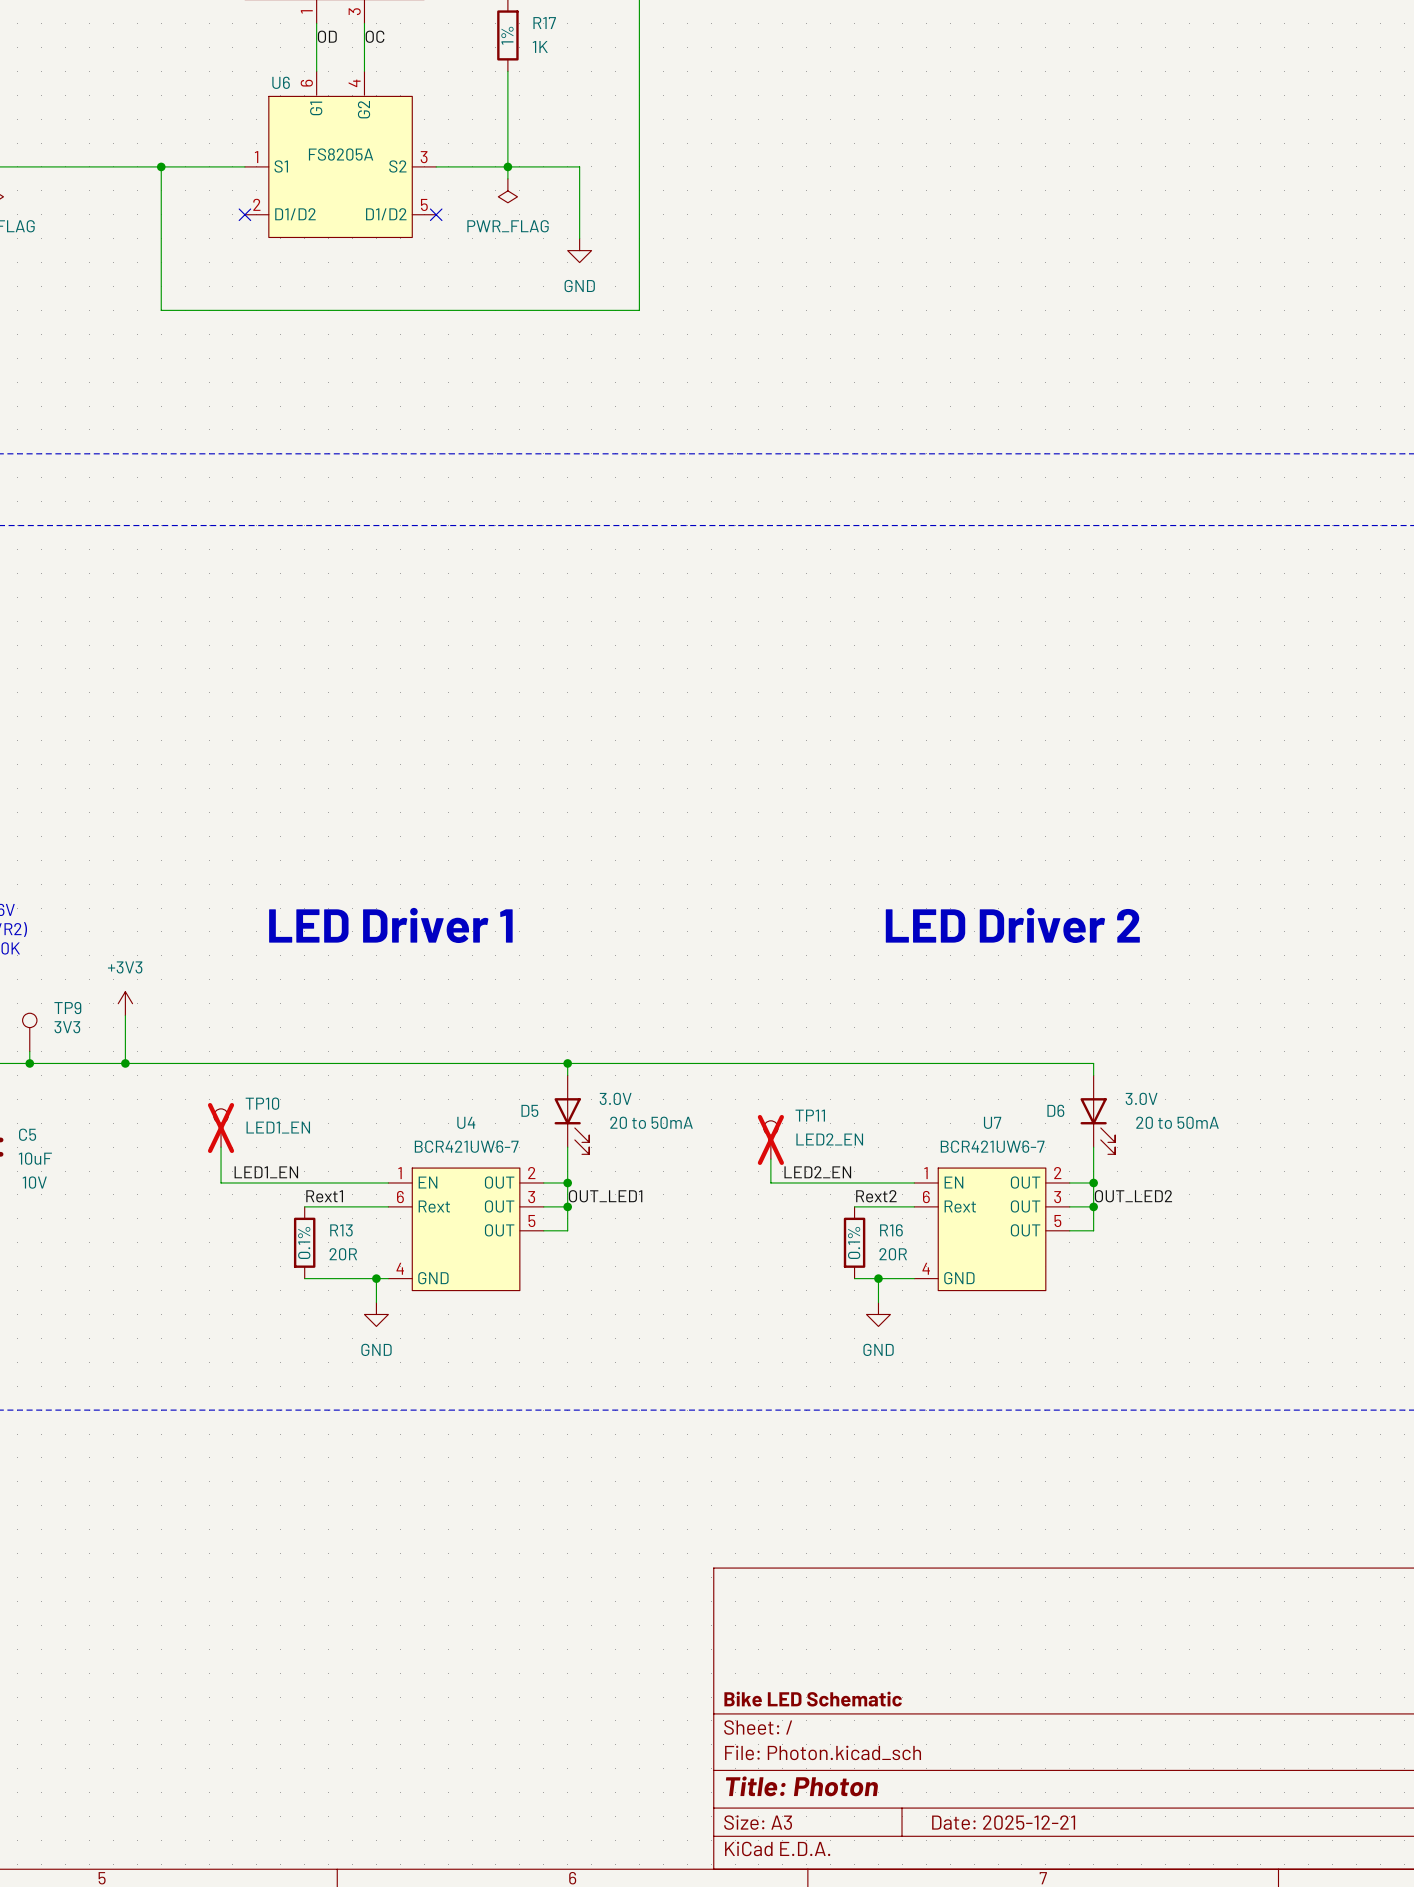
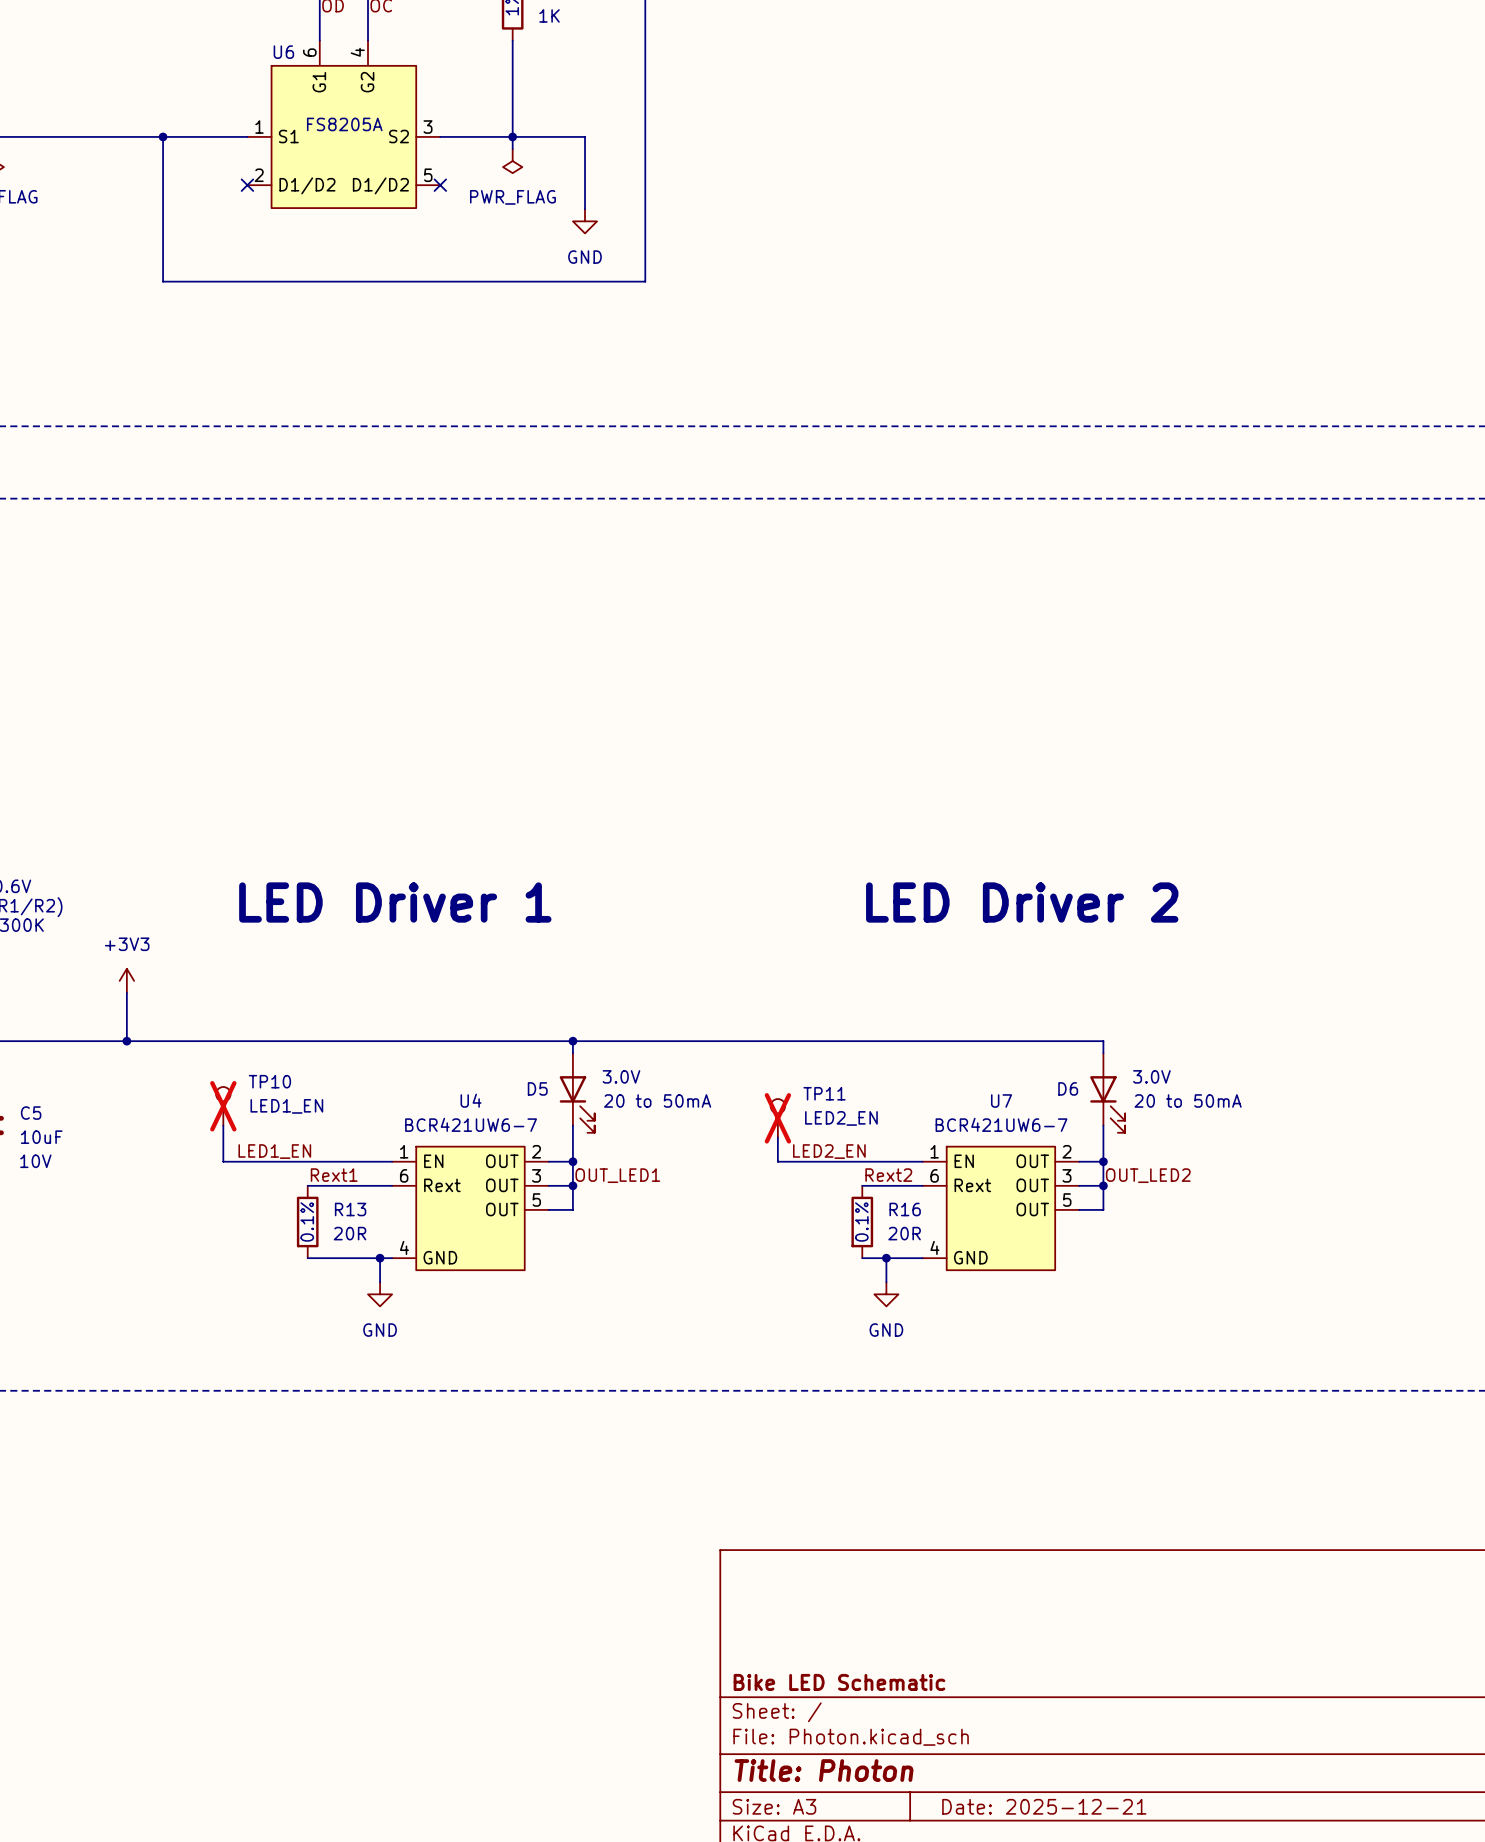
TP9: 3V3 (29, 1032) -> none
wire: (29, 1051) (29, 1063) -> none
junction: (29, 1063) -> none

